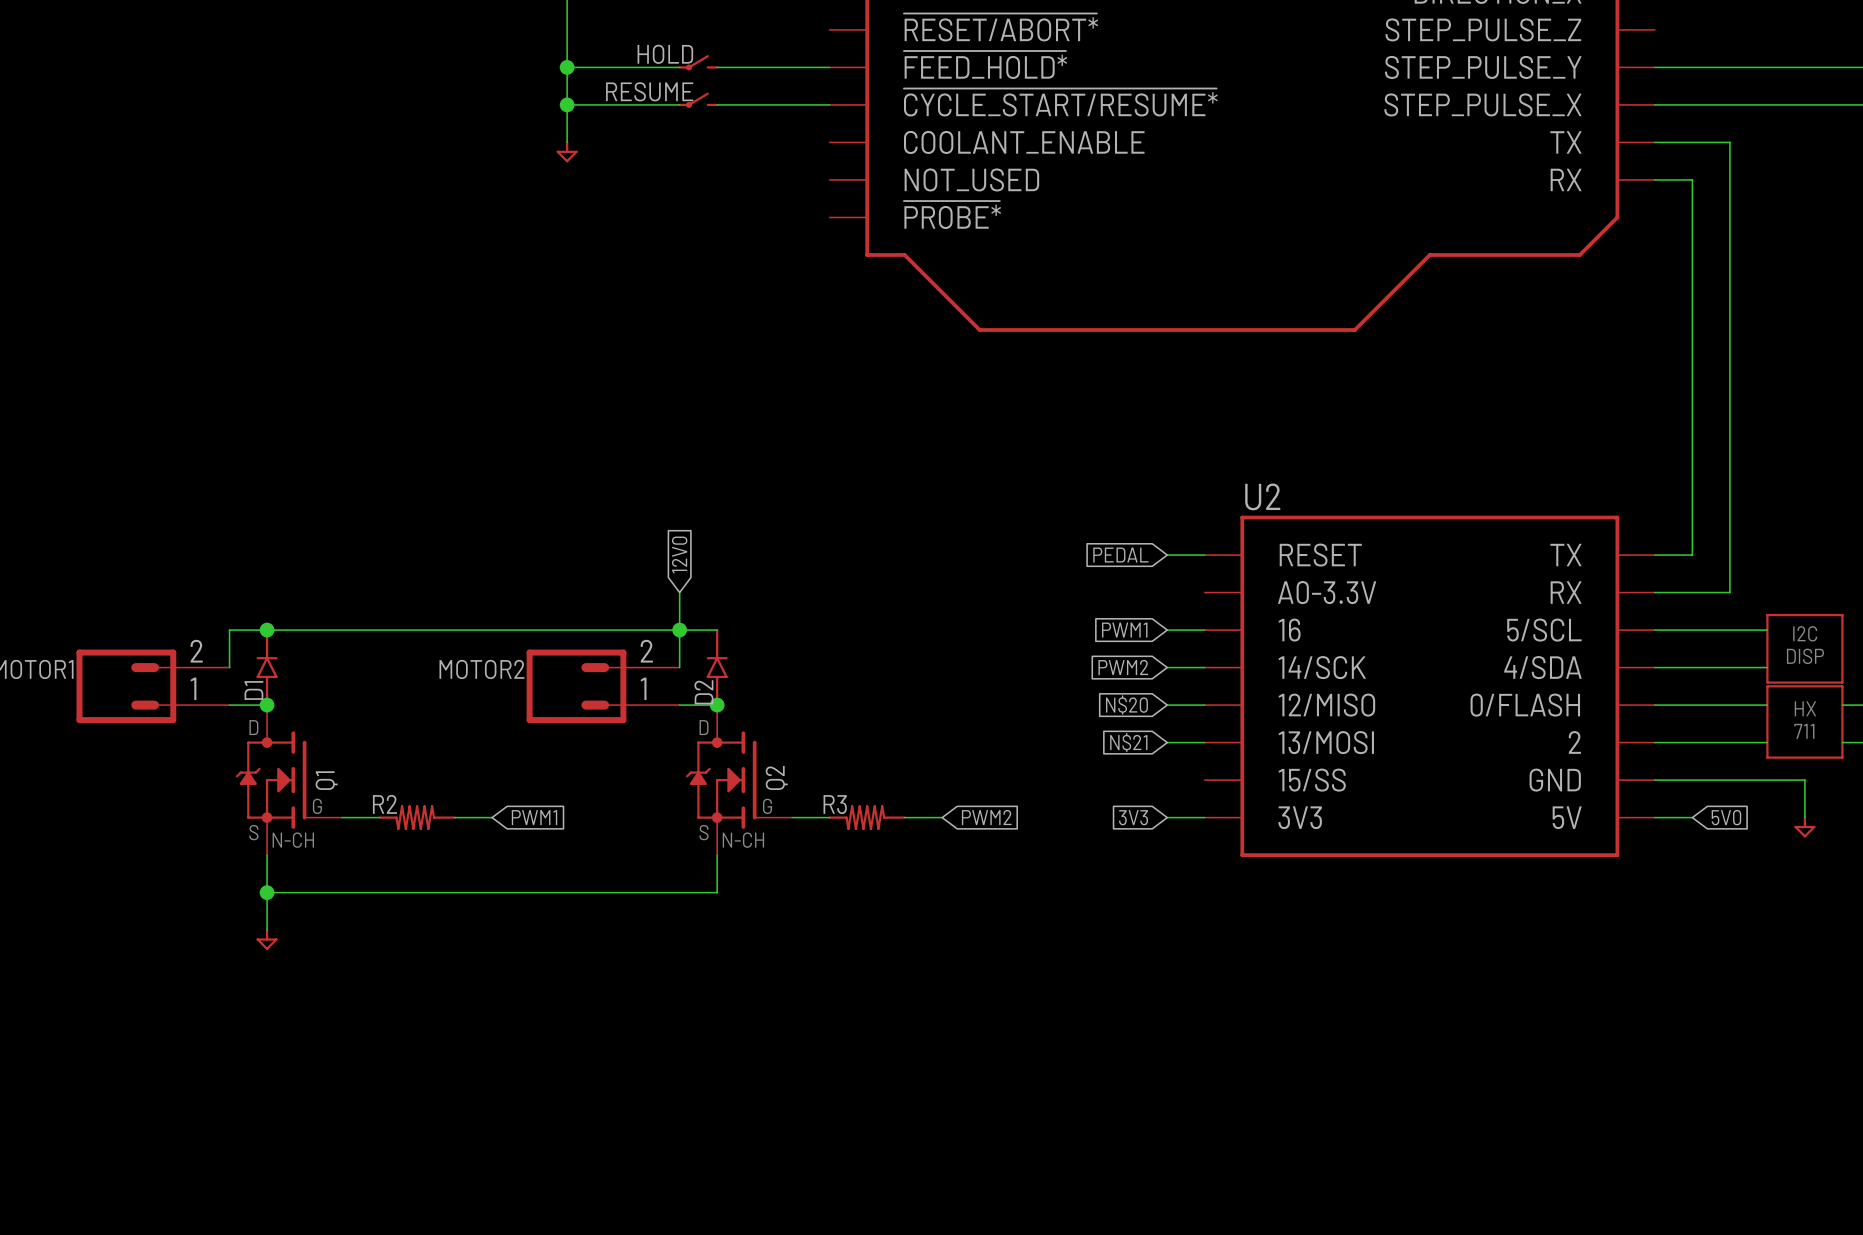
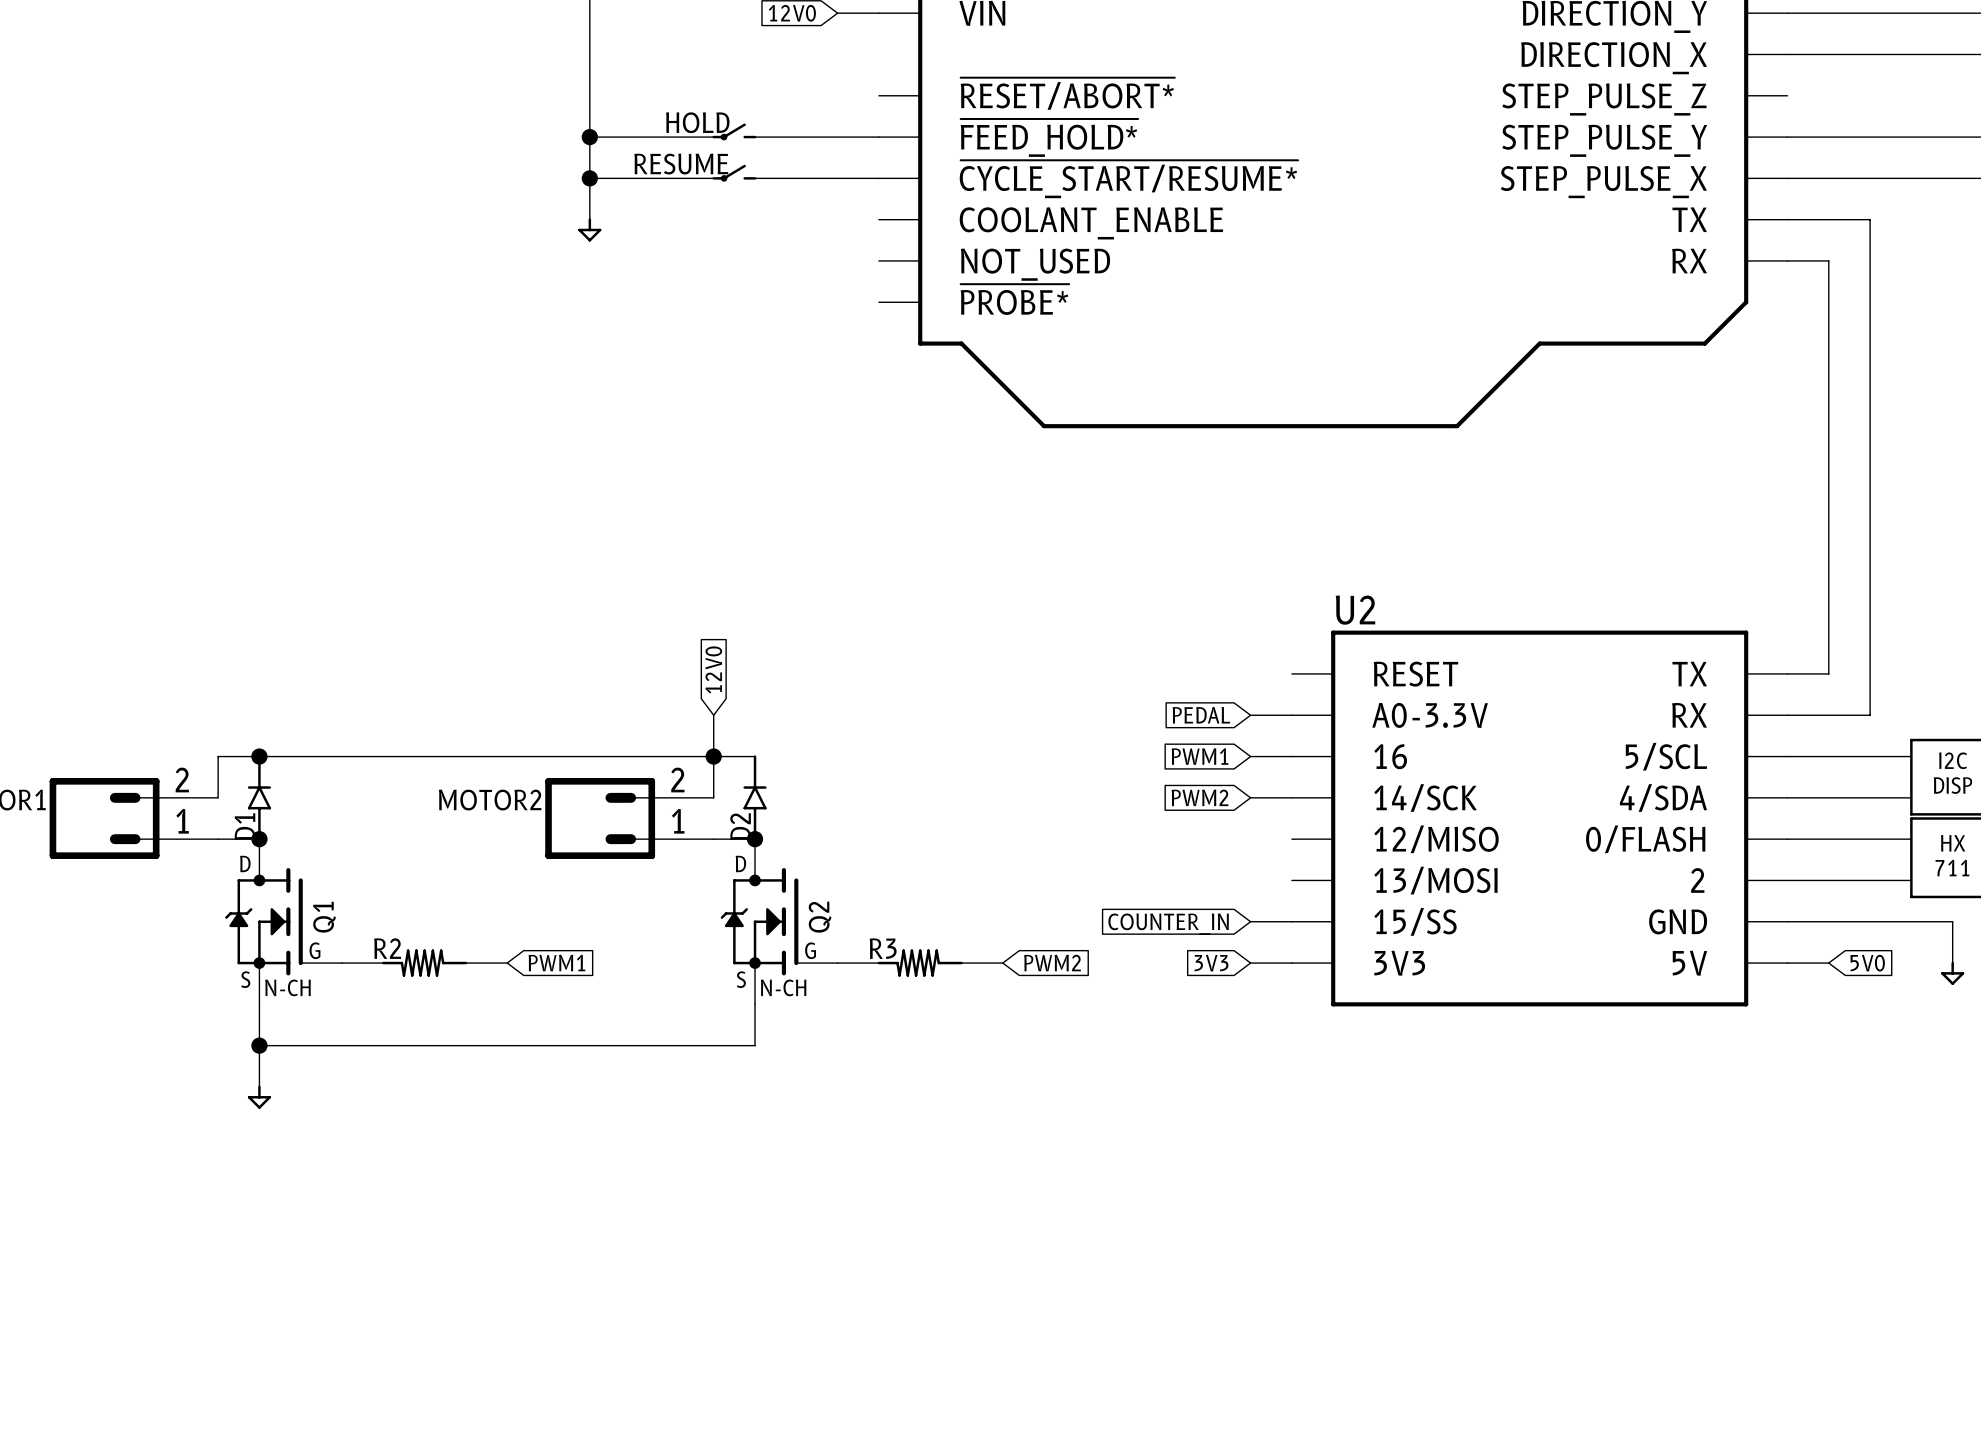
global label position: PEDAL (1120, 555) -> PEDAL (1201, 715)
wire: (1167, 555) (1204, 555) -> (1250, 715) (1291, 715)
global label: N$20 (1126, 705) -> none
wire: (1167, 705) (1204, 705) -> none
global label: N$21 (1128, 742) -> none
wire: (1167, 742) (1204, 742) -> (1250, 921) (1291, 921)
global label: none -> COUNTER_IN (1168, 924)

